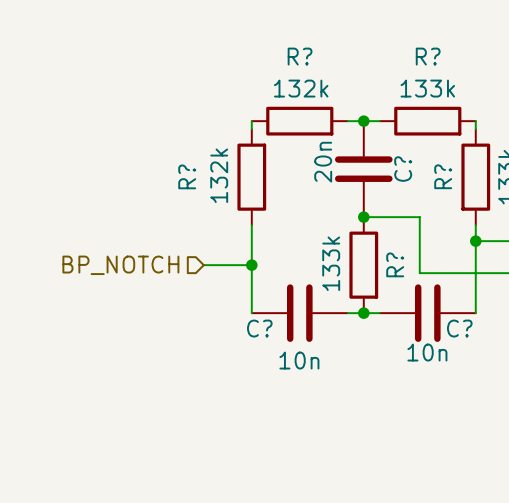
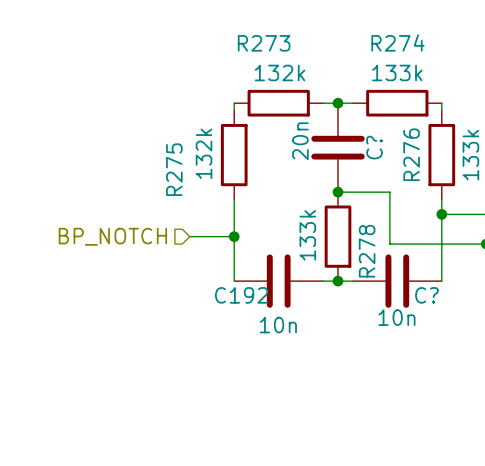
R? name: R? (300, 56) -> R273 (264, 43)
R? name: R? (428, 56) -> R274 (398, 42)
R? name: R? (187, 176) -> R275 (174, 169)
R? name: R? (443, 176) -> R276 (411, 154)
R? name: R? (395, 264) -> R278 (367, 251)
C? name: C? (259, 328) -> C192 (241, 295)

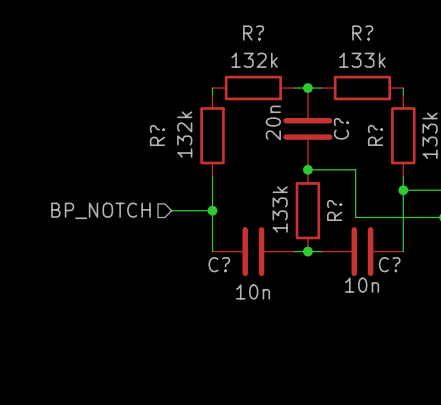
R274 name: R274 (398, 42) -> R? (362, 33)
R273 name: R273 (264, 43) -> R? (253, 33)
R276 name: R276 (411, 154) -> R? (375, 135)
R275 name: R275 (174, 169) -> R? (157, 135)
R278 name: R278 (367, 251) -> R? (334, 210)
C192 name: C192 (241, 295) -> C? (219, 264)

